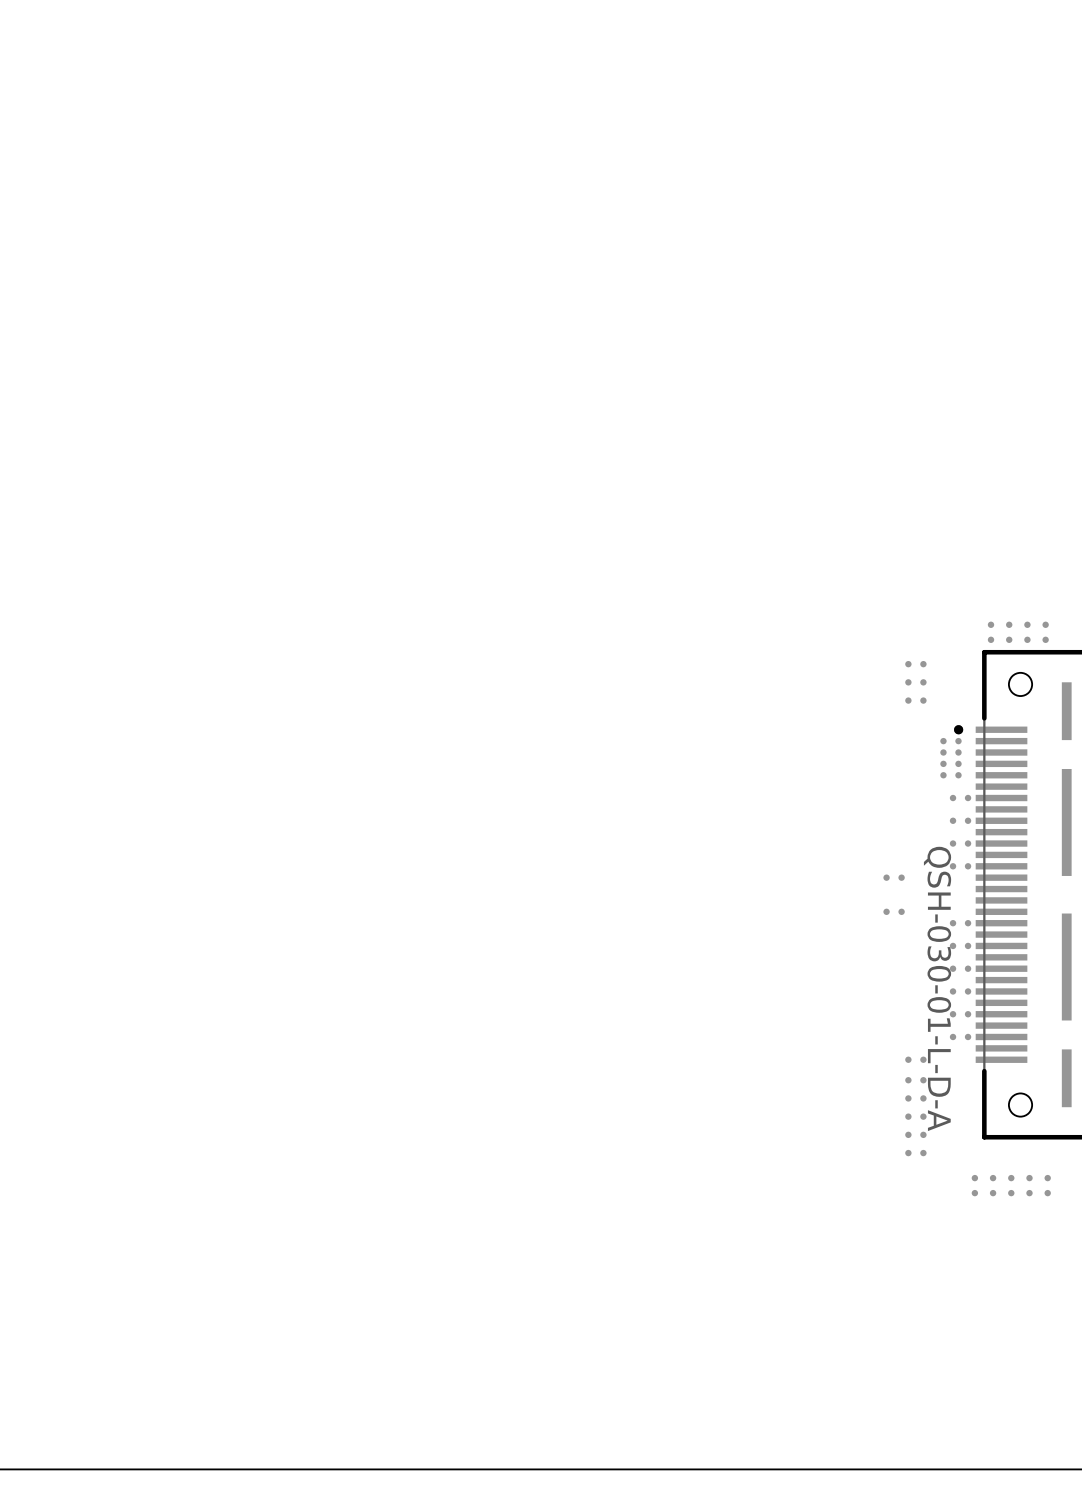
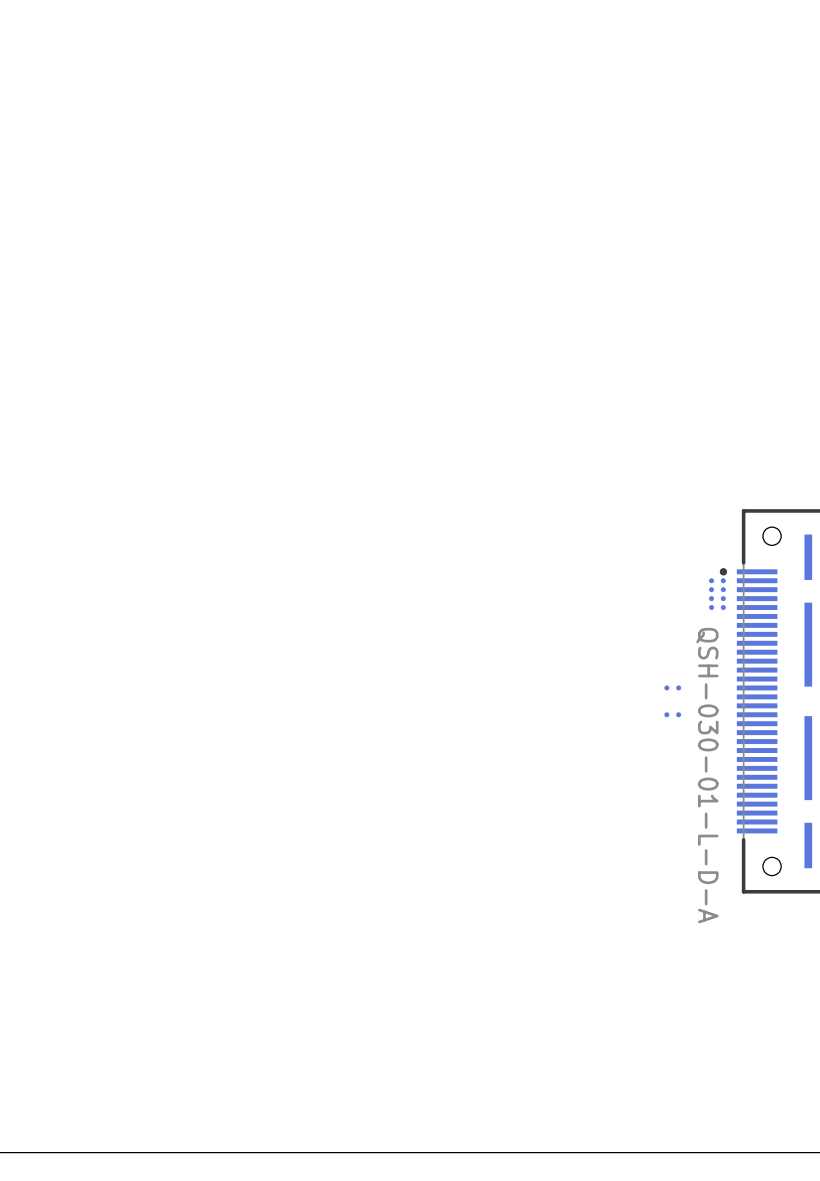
part: (991, 632) -> none
part: (1009, 632) -> none
part: (1027, 632) -> none
part: (1045, 632) -> none
part: (915, 664) -> none
part: (915, 682) -> none
part: (915, 700) -> none
part: (960, 798) -> none
part: (960, 820) -> none
part: (960, 843) -> none
part: (960, 866) -> none
part: (960, 923) -> none
part: (960, 945) -> none
part: (960, 968) -> none
part: (960, 991) -> none
part: (960, 1014) -> none
part: (960, 1036) -> none
part: (915, 1059) -> none
part: (915, 1080) -> none
part: (915, 1098) -> none
part: (915, 1116) -> none
part: (915, 1134) -> none
part: (915, 1153) -> none
part: (974, 1185) -> none
part: (993, 1185) -> none
part: (1011, 1185) -> none
part: (1029, 1185) -> none
part: (1047, 1185) -> none

